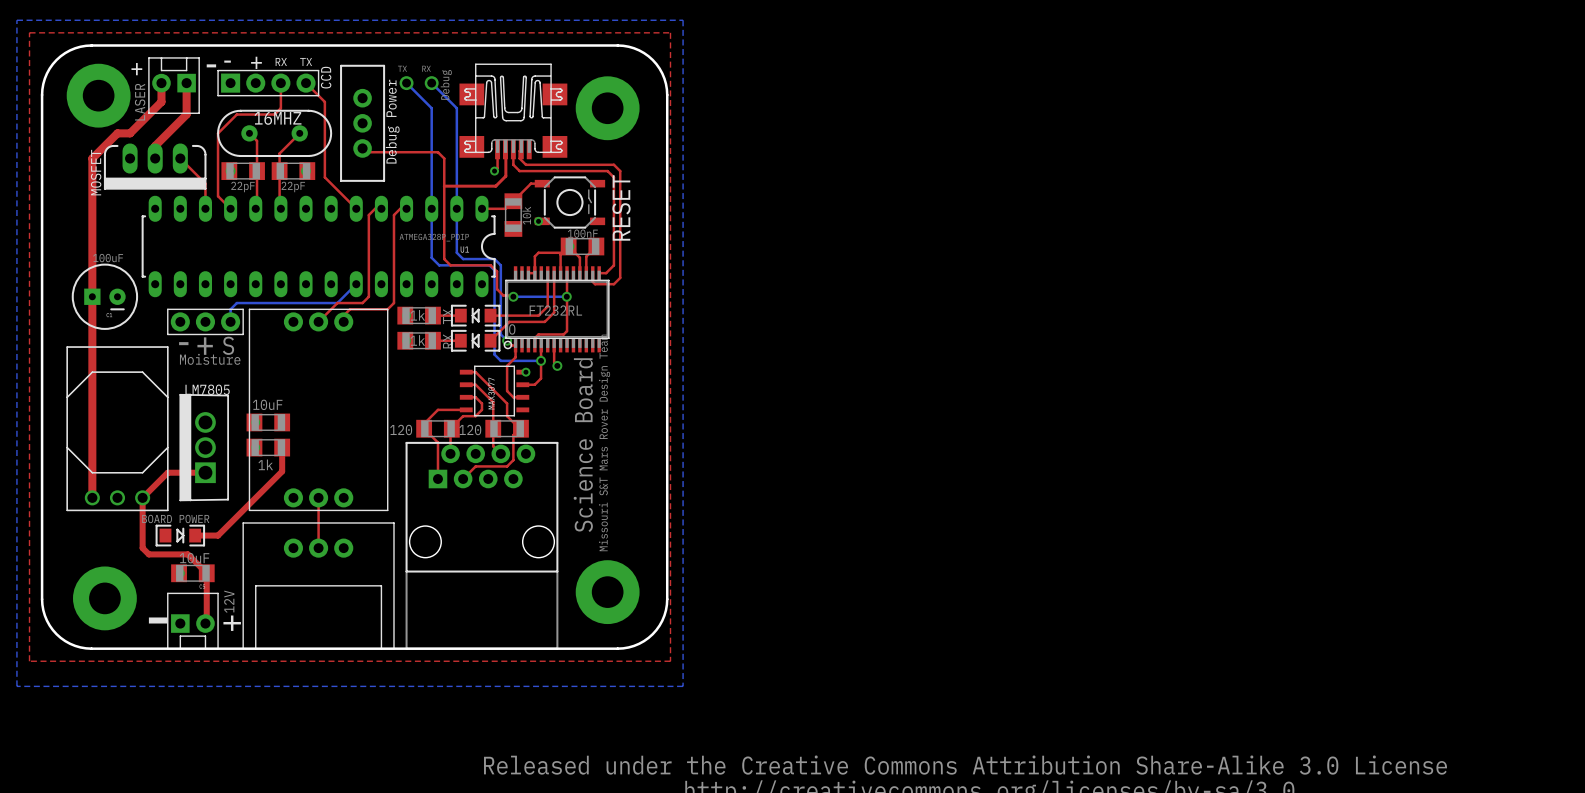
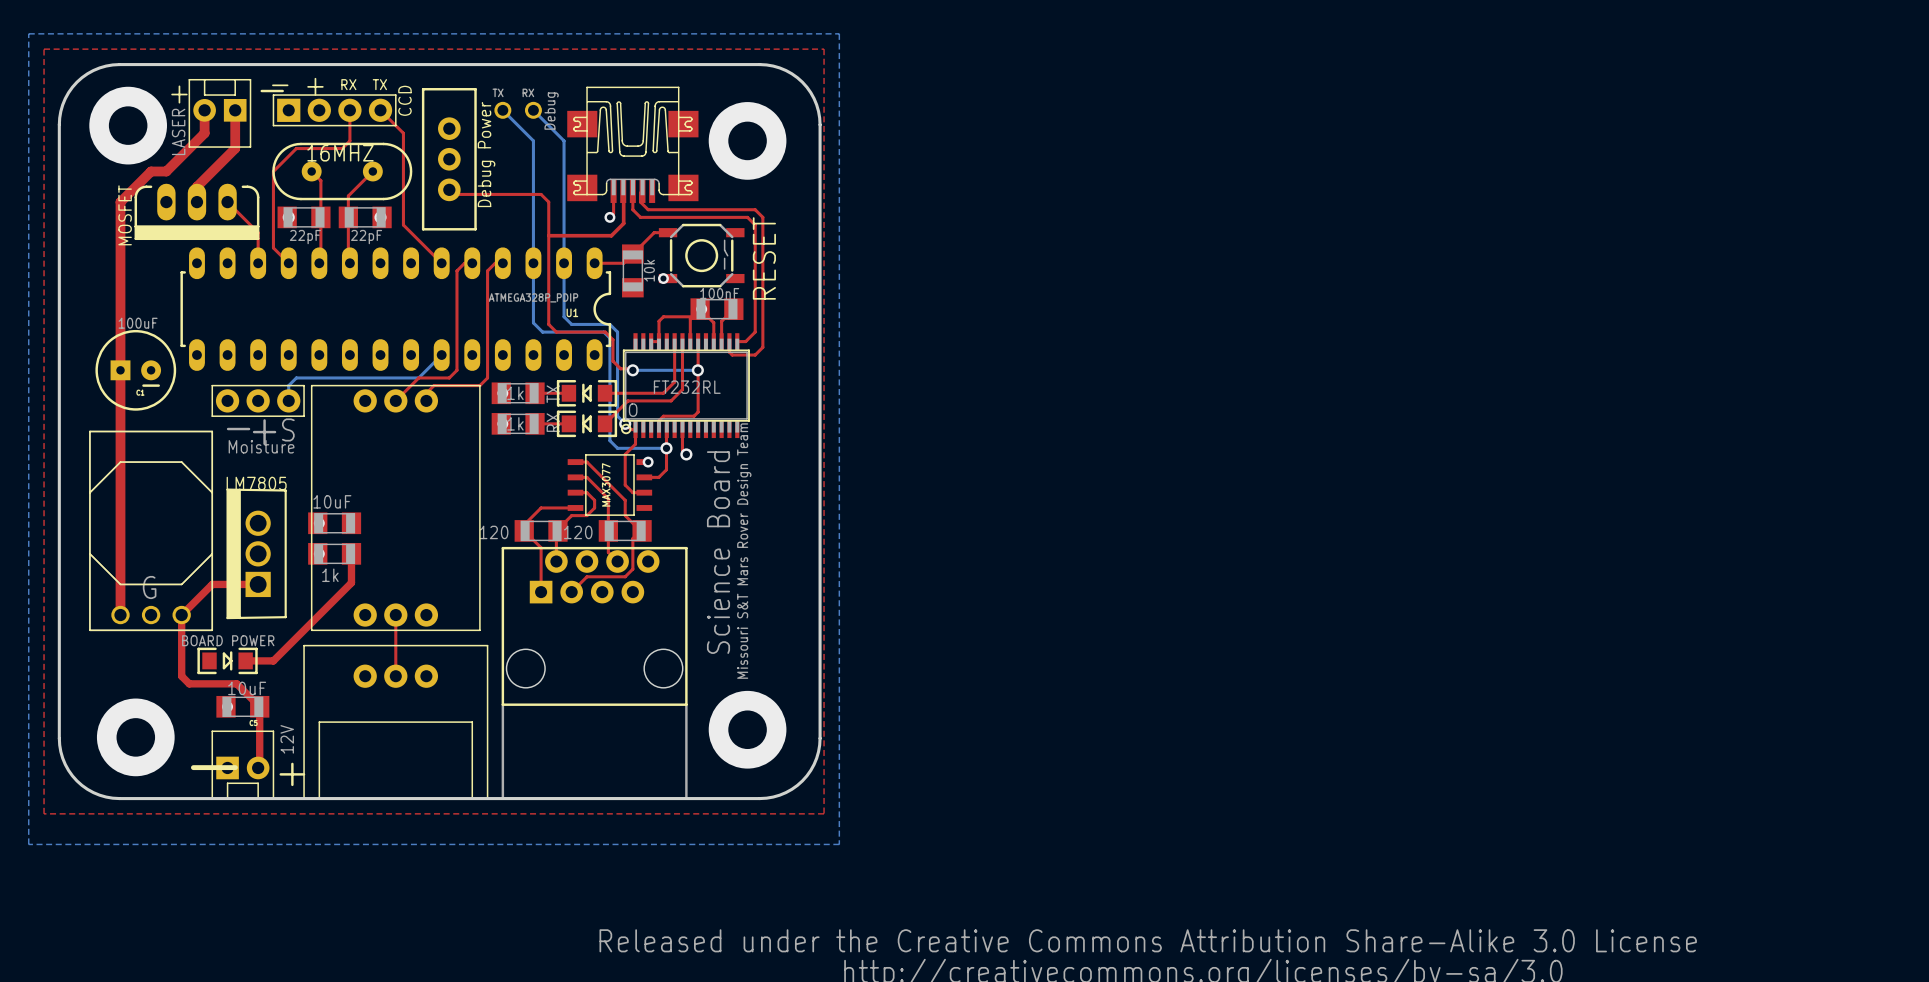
text: none -> G (149, 587)

